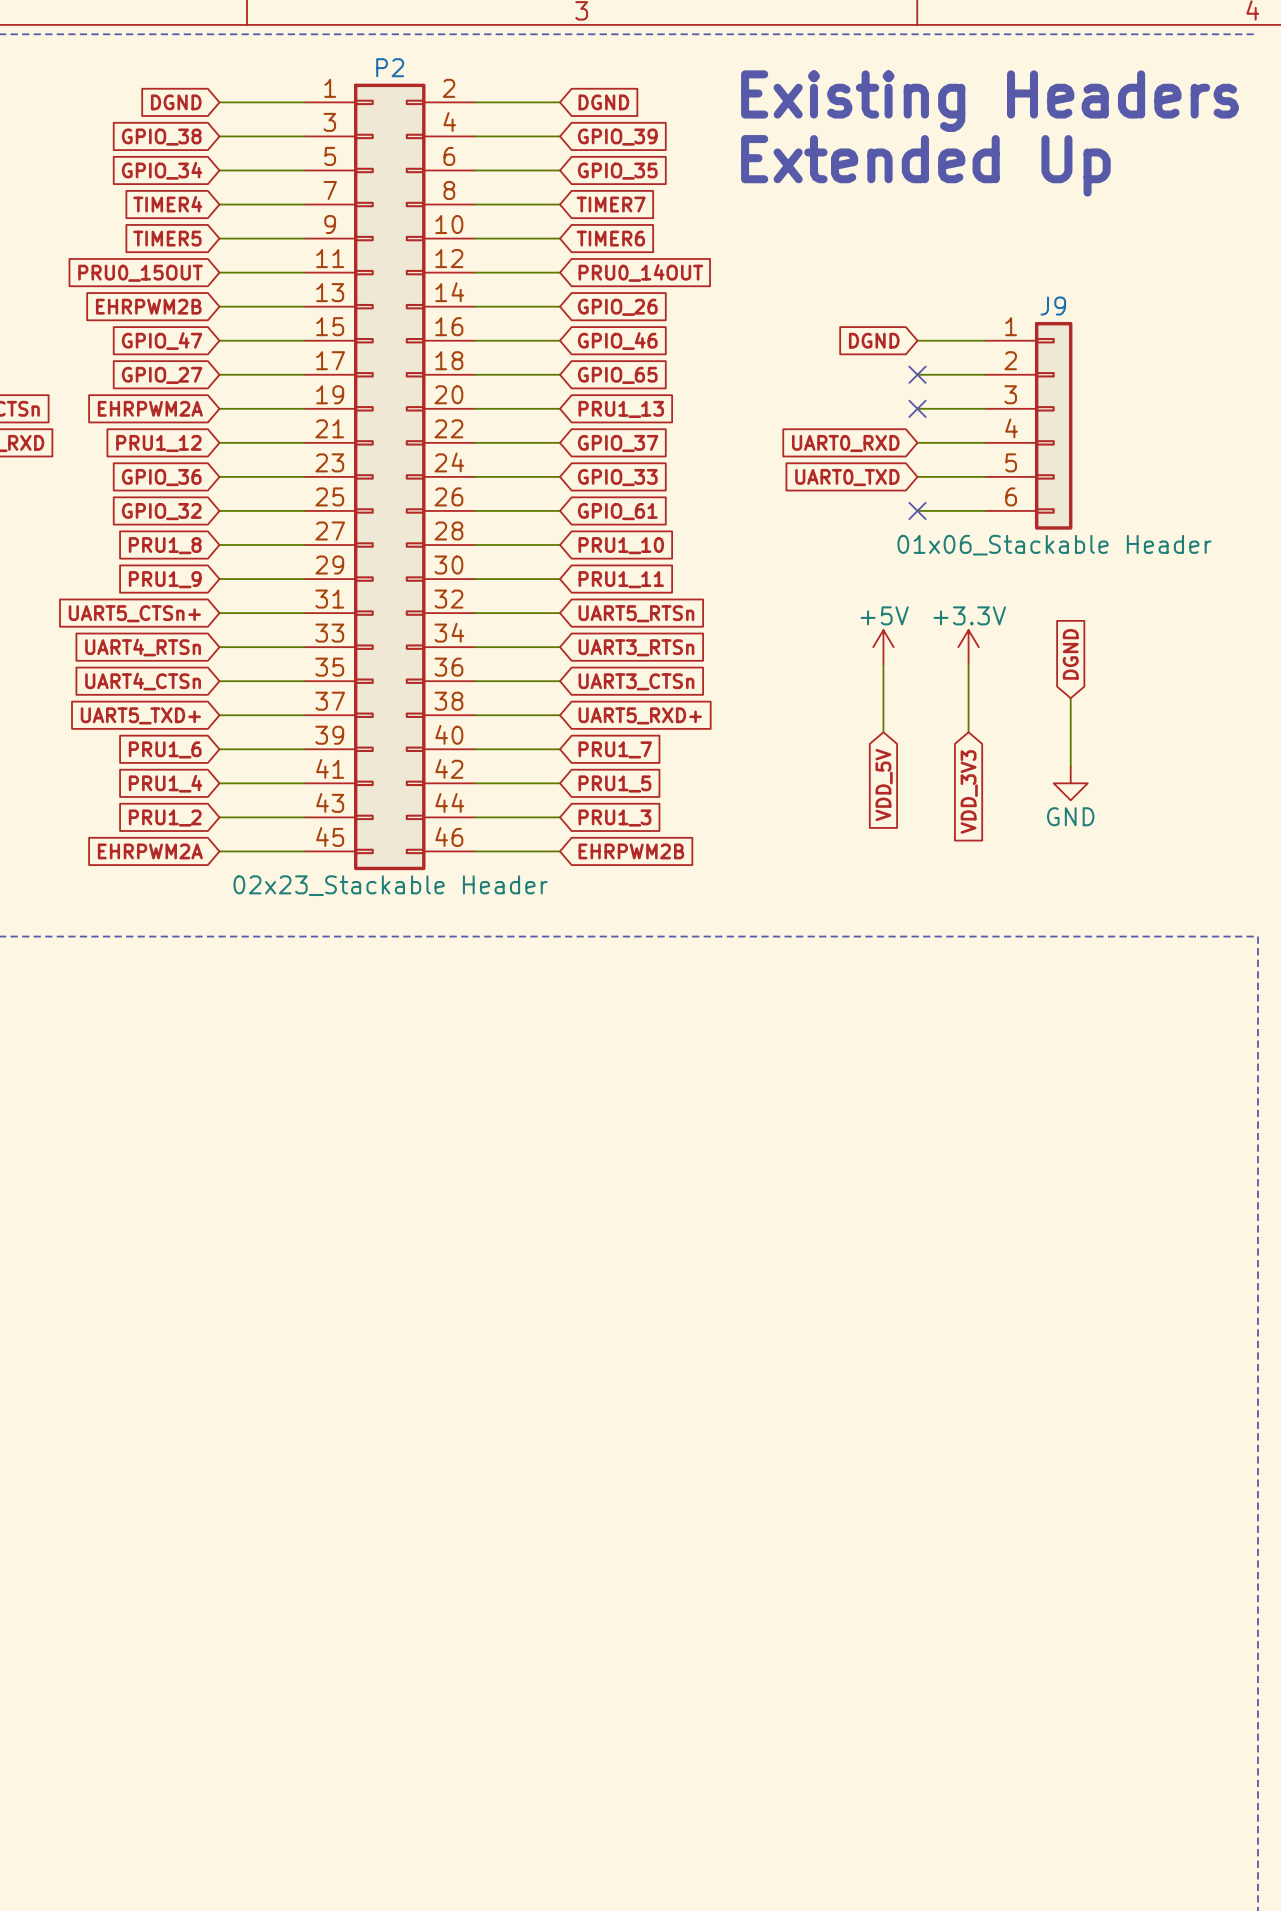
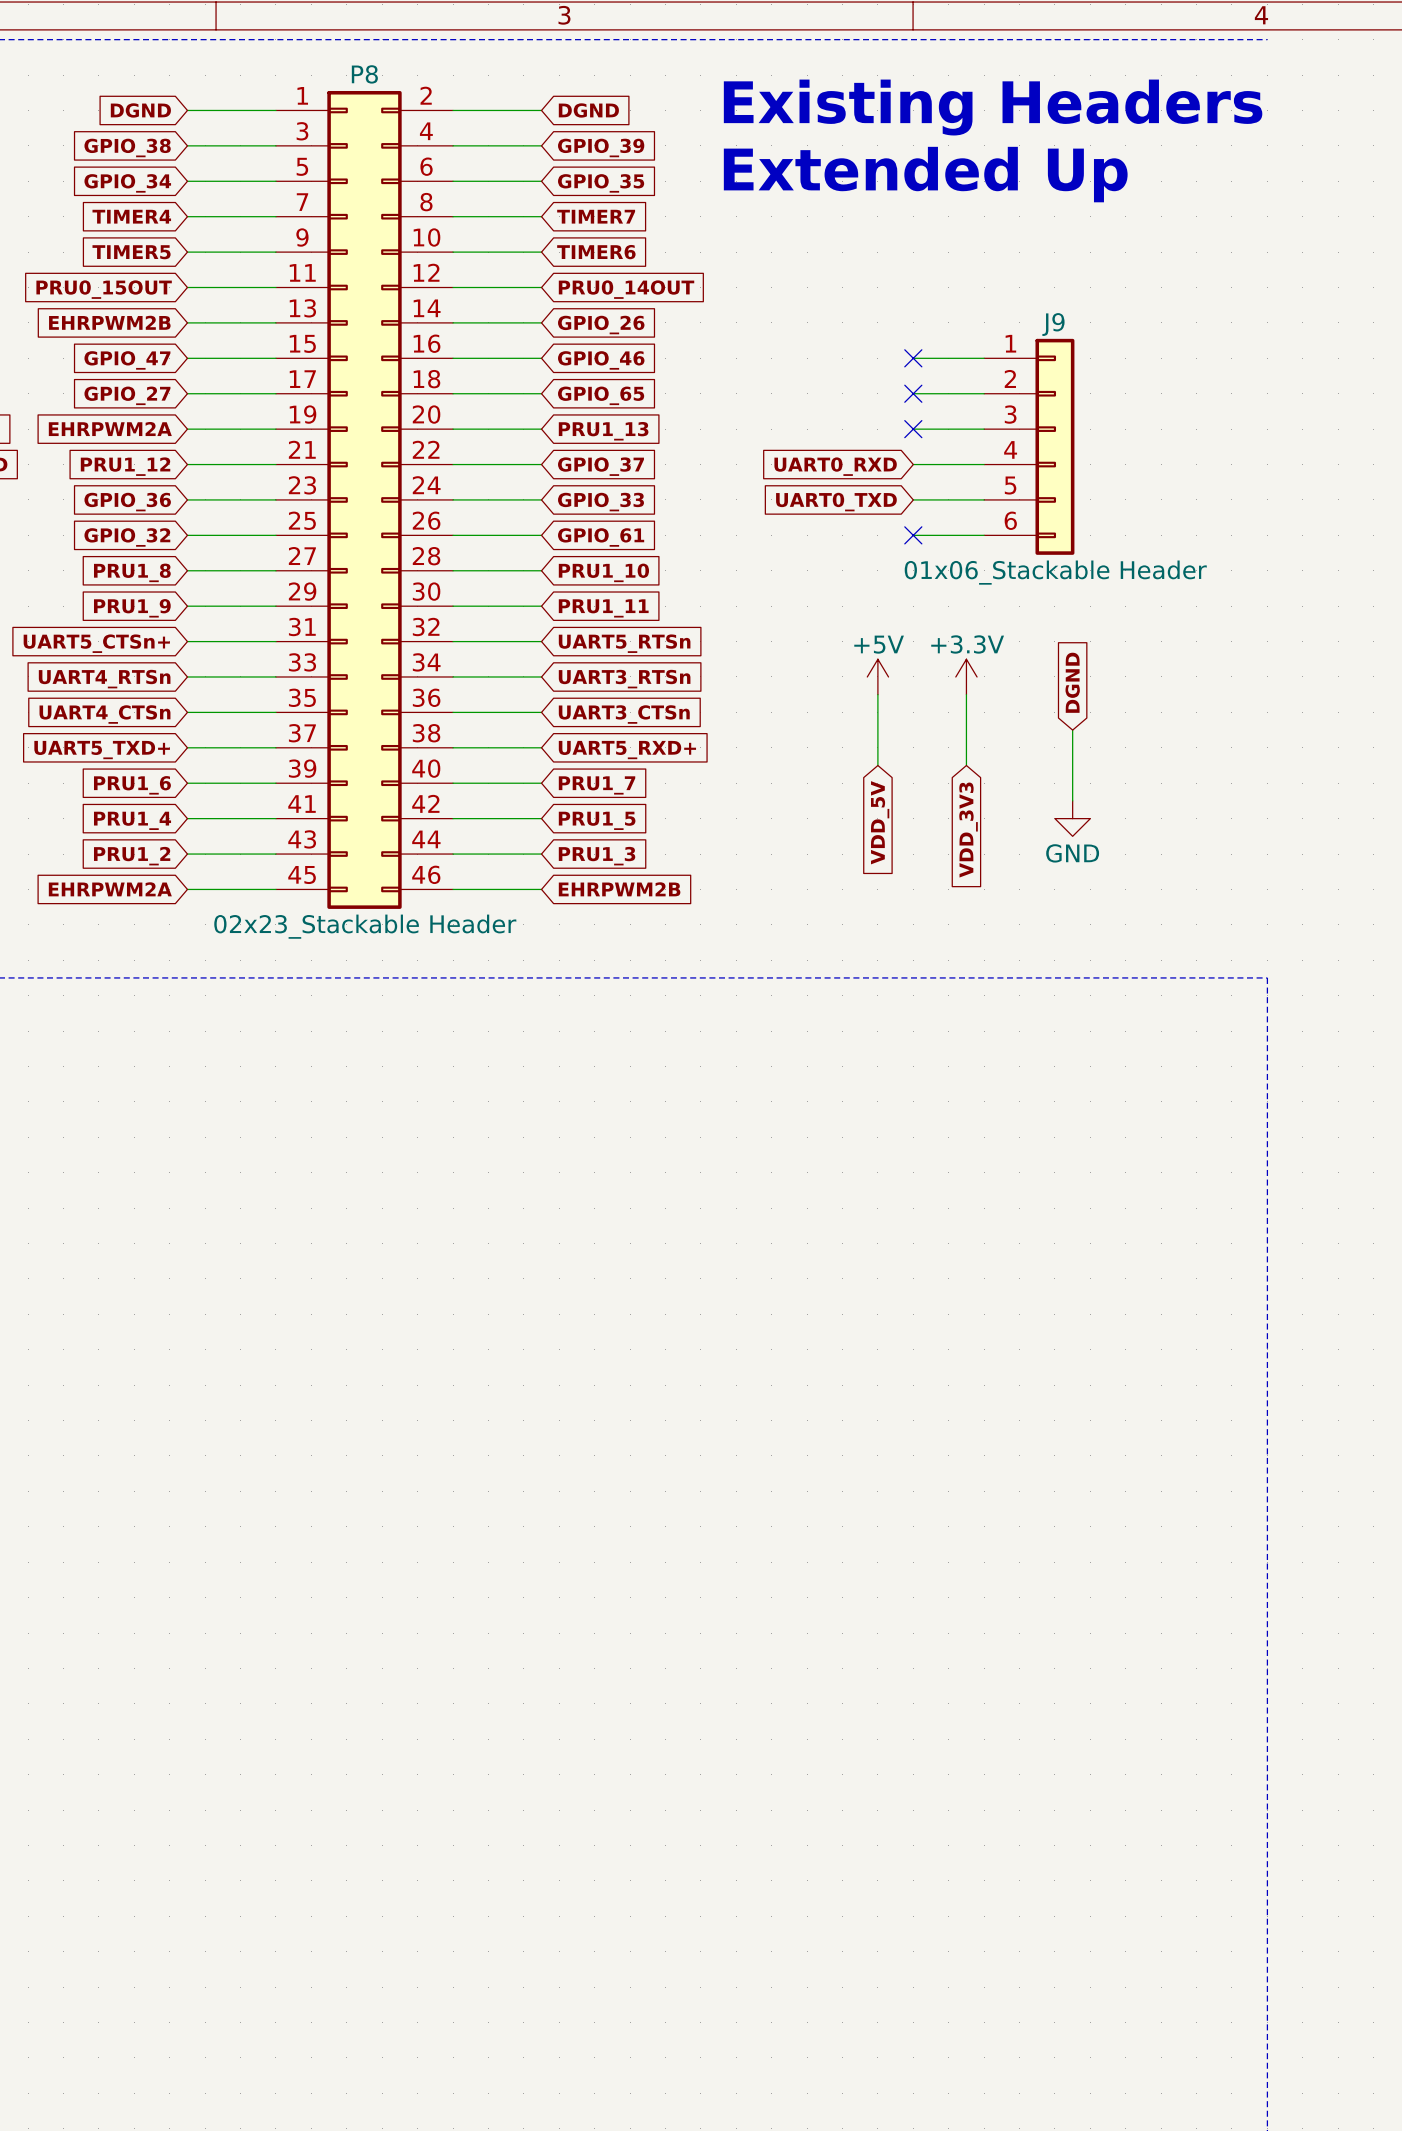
P2 name: P2 (390, 67) -> P8 (364, 74)
global label: DGND (874, 340) -> none
no-connect mark: none -> (913, 358)

